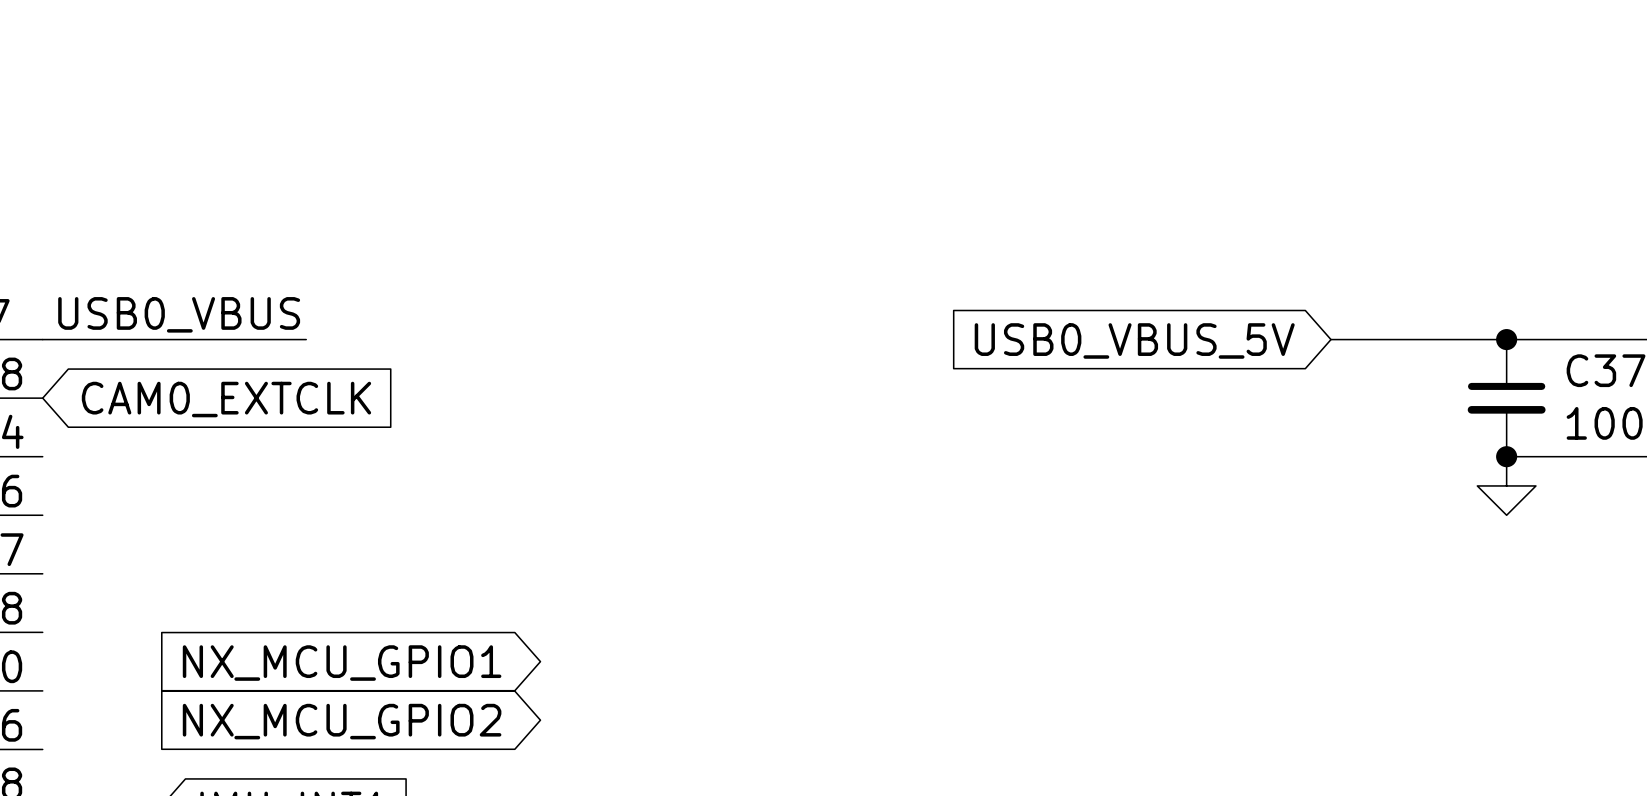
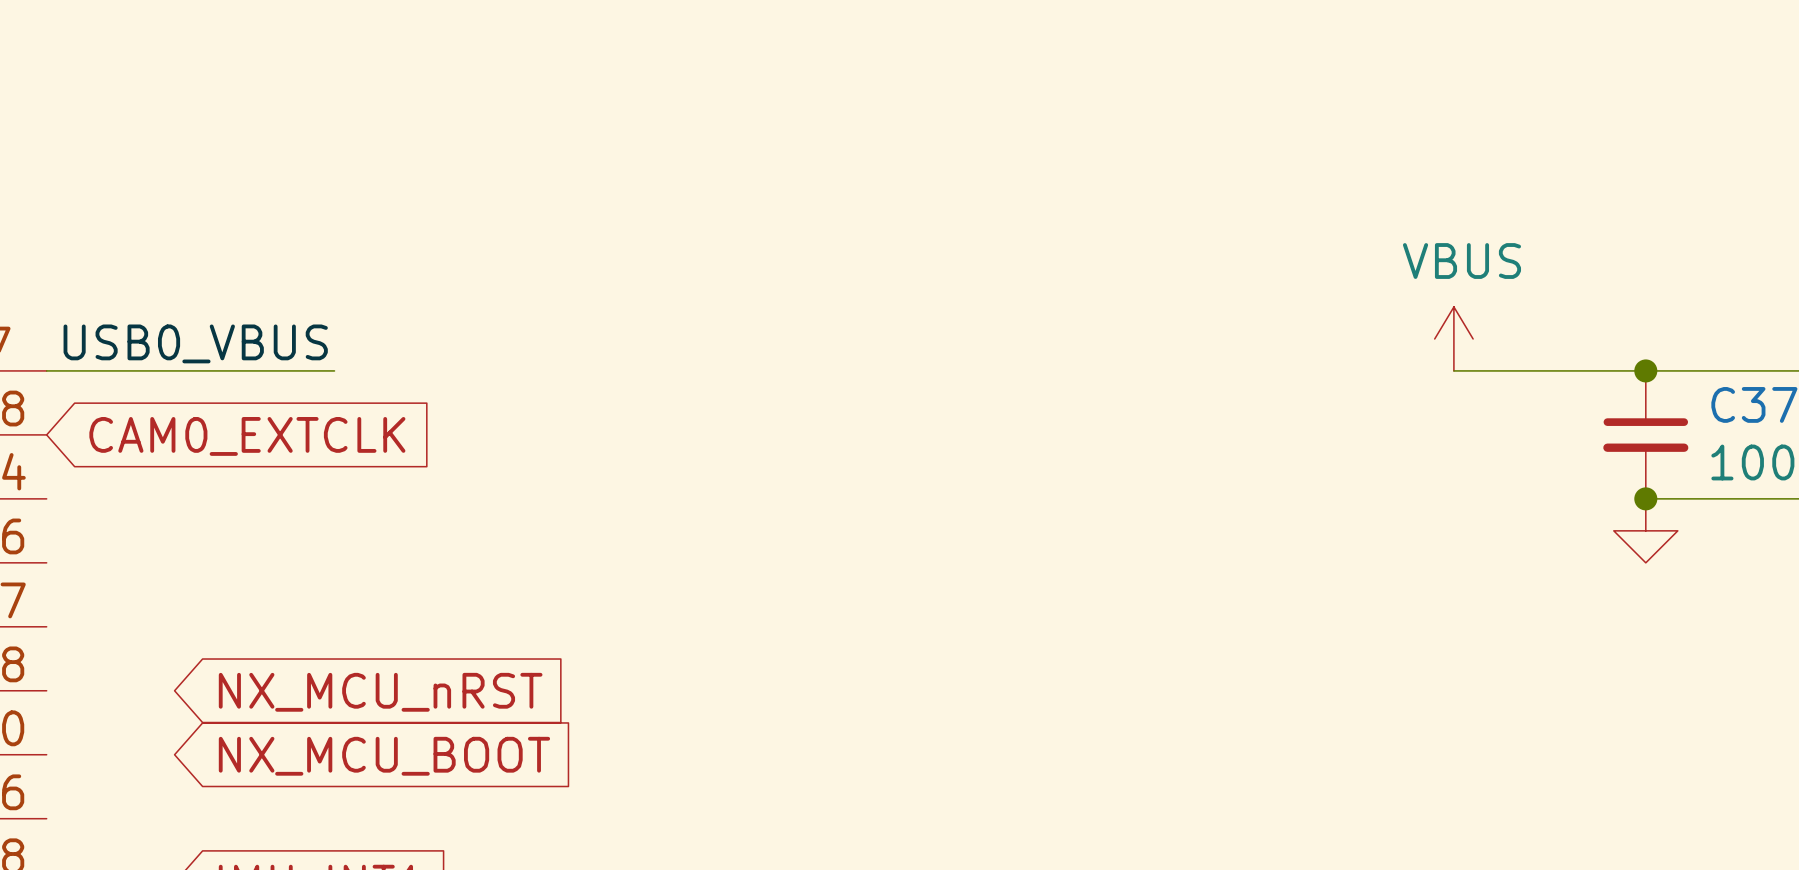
power symbol: none -> VBUS (1453, 338)
global label: USB0_VBUS_5V (1134, 340) -> none
global label: none -> NX_MCU_nRST (380, 692)
global label: NX_MCU_GPIO1 (342, 663) -> none
global label: none -> NX_MCU_BOOT (384, 756)
global label: NX_MCU_GPIO2 (342, 721) -> none

